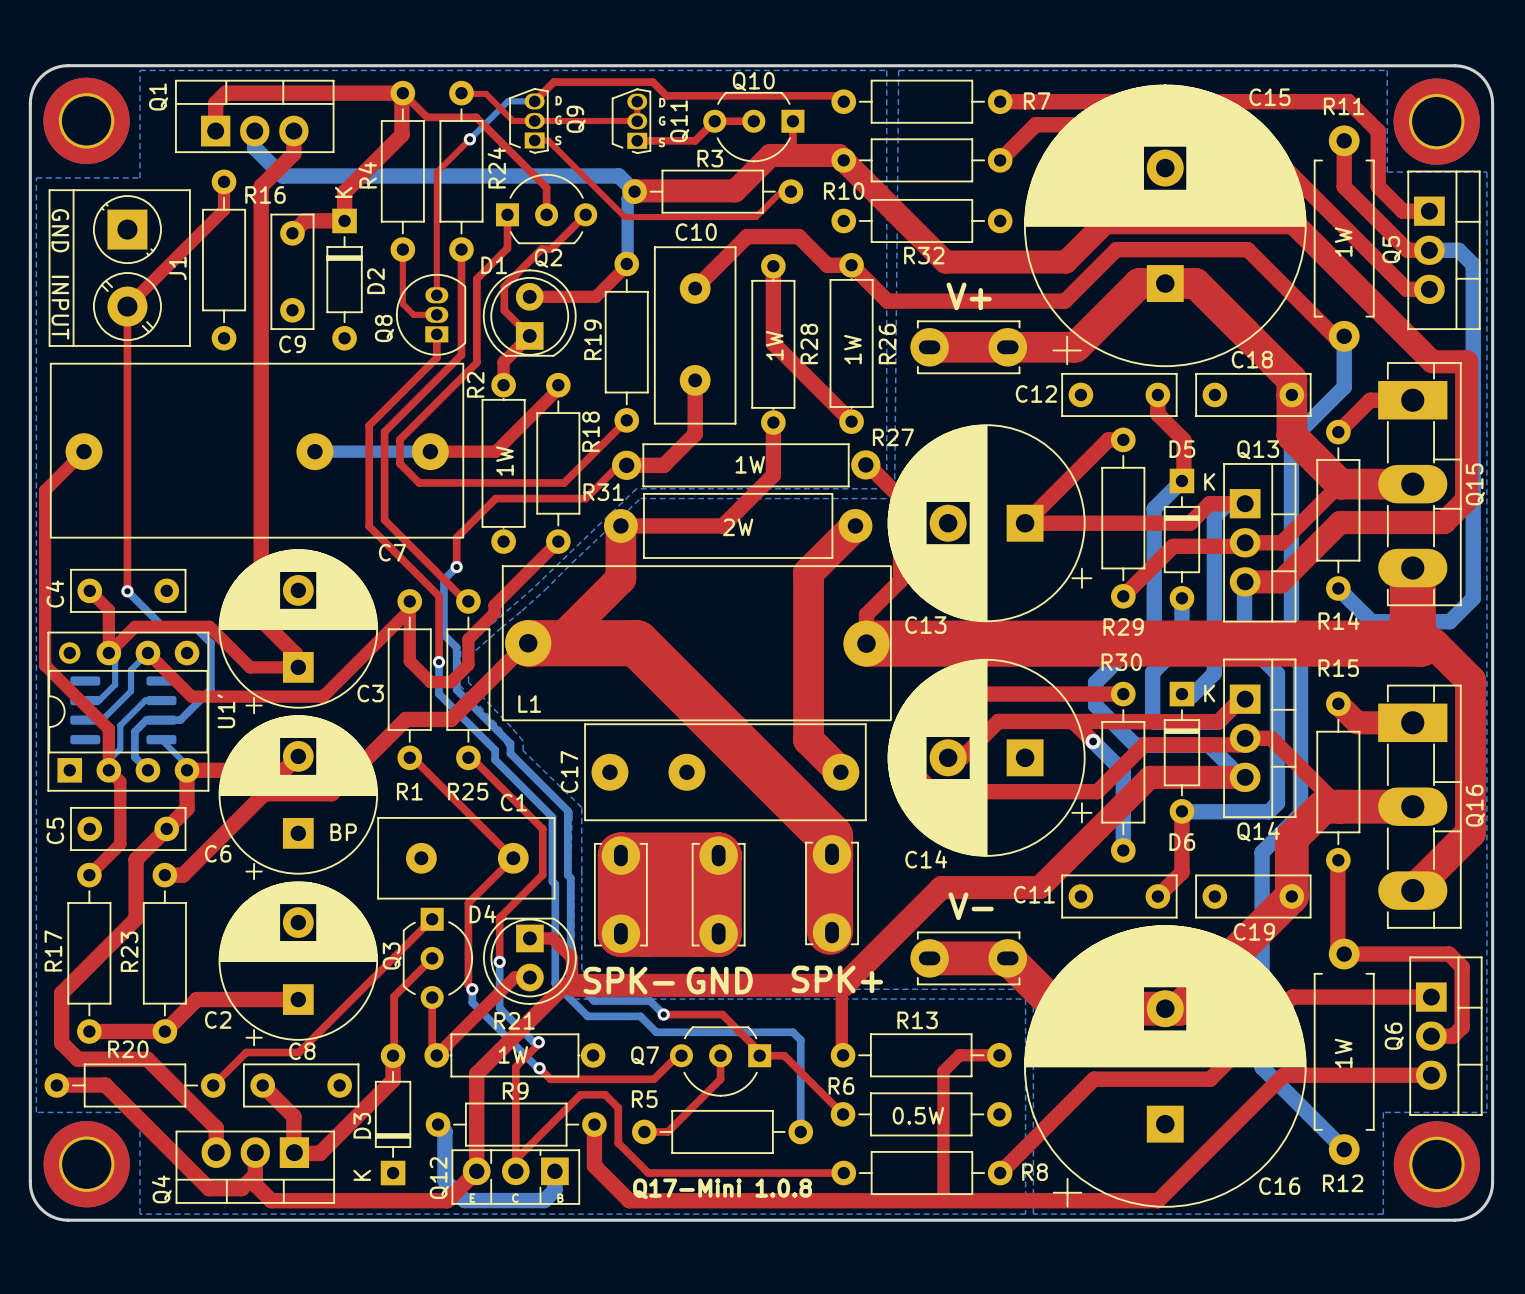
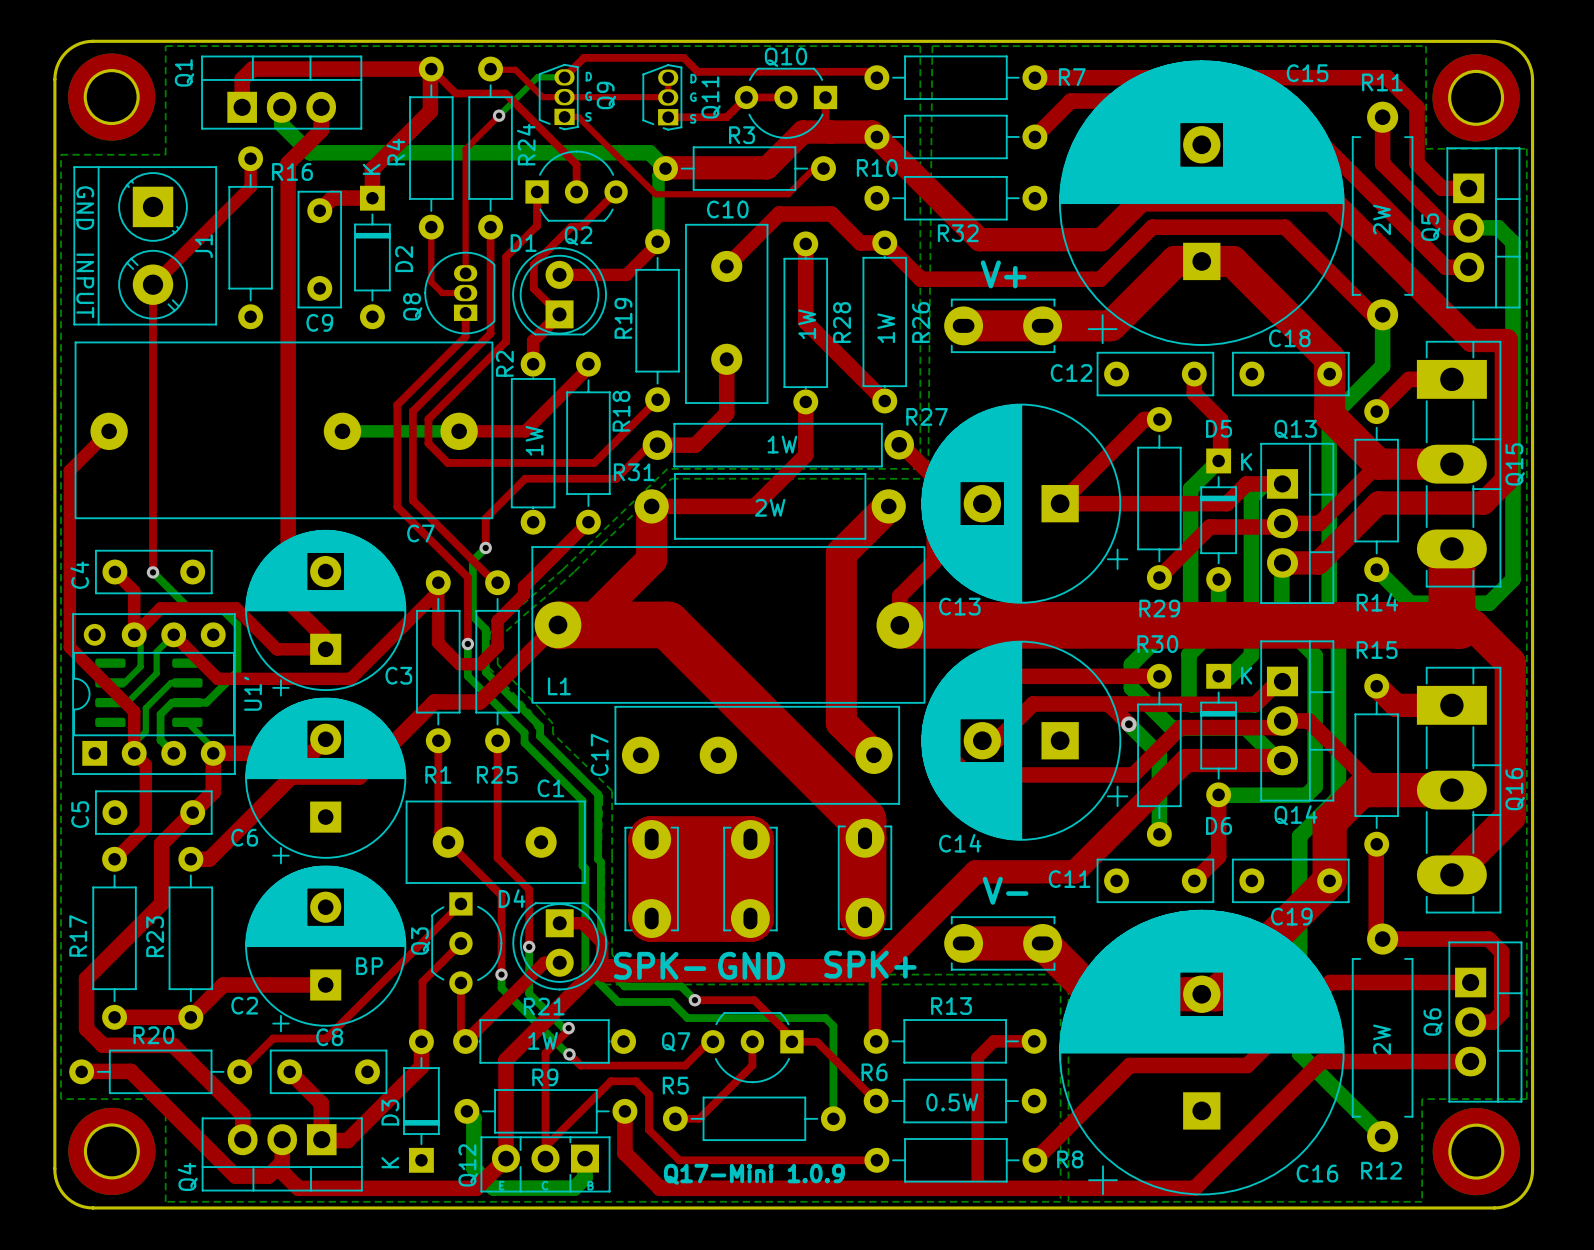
text: 1W (1343, 242) -> 2W (1382, 219)
top track: (412, 757) (513, 858) (468, 903) (468, 985) (472, 989) -> (438, 740) (438, 832) (501, 895) (501, 974)
top track: (471, 757) (542, 828) (542, 874) (499, 917) -> (497, 740) (497, 858) (529, 889) (529, 902)
text position: BP (343, 832) -> BP (369, 966)
C1 rotation: 0° (466, 858) -> 180° (495, 842)
text: 1W (1343, 1053) -> 2W (1382, 1039)
text: Q17-Mini 1.0.8 (722, 1188) -> Q17-Mini 1.0.9 (754, 1174)

